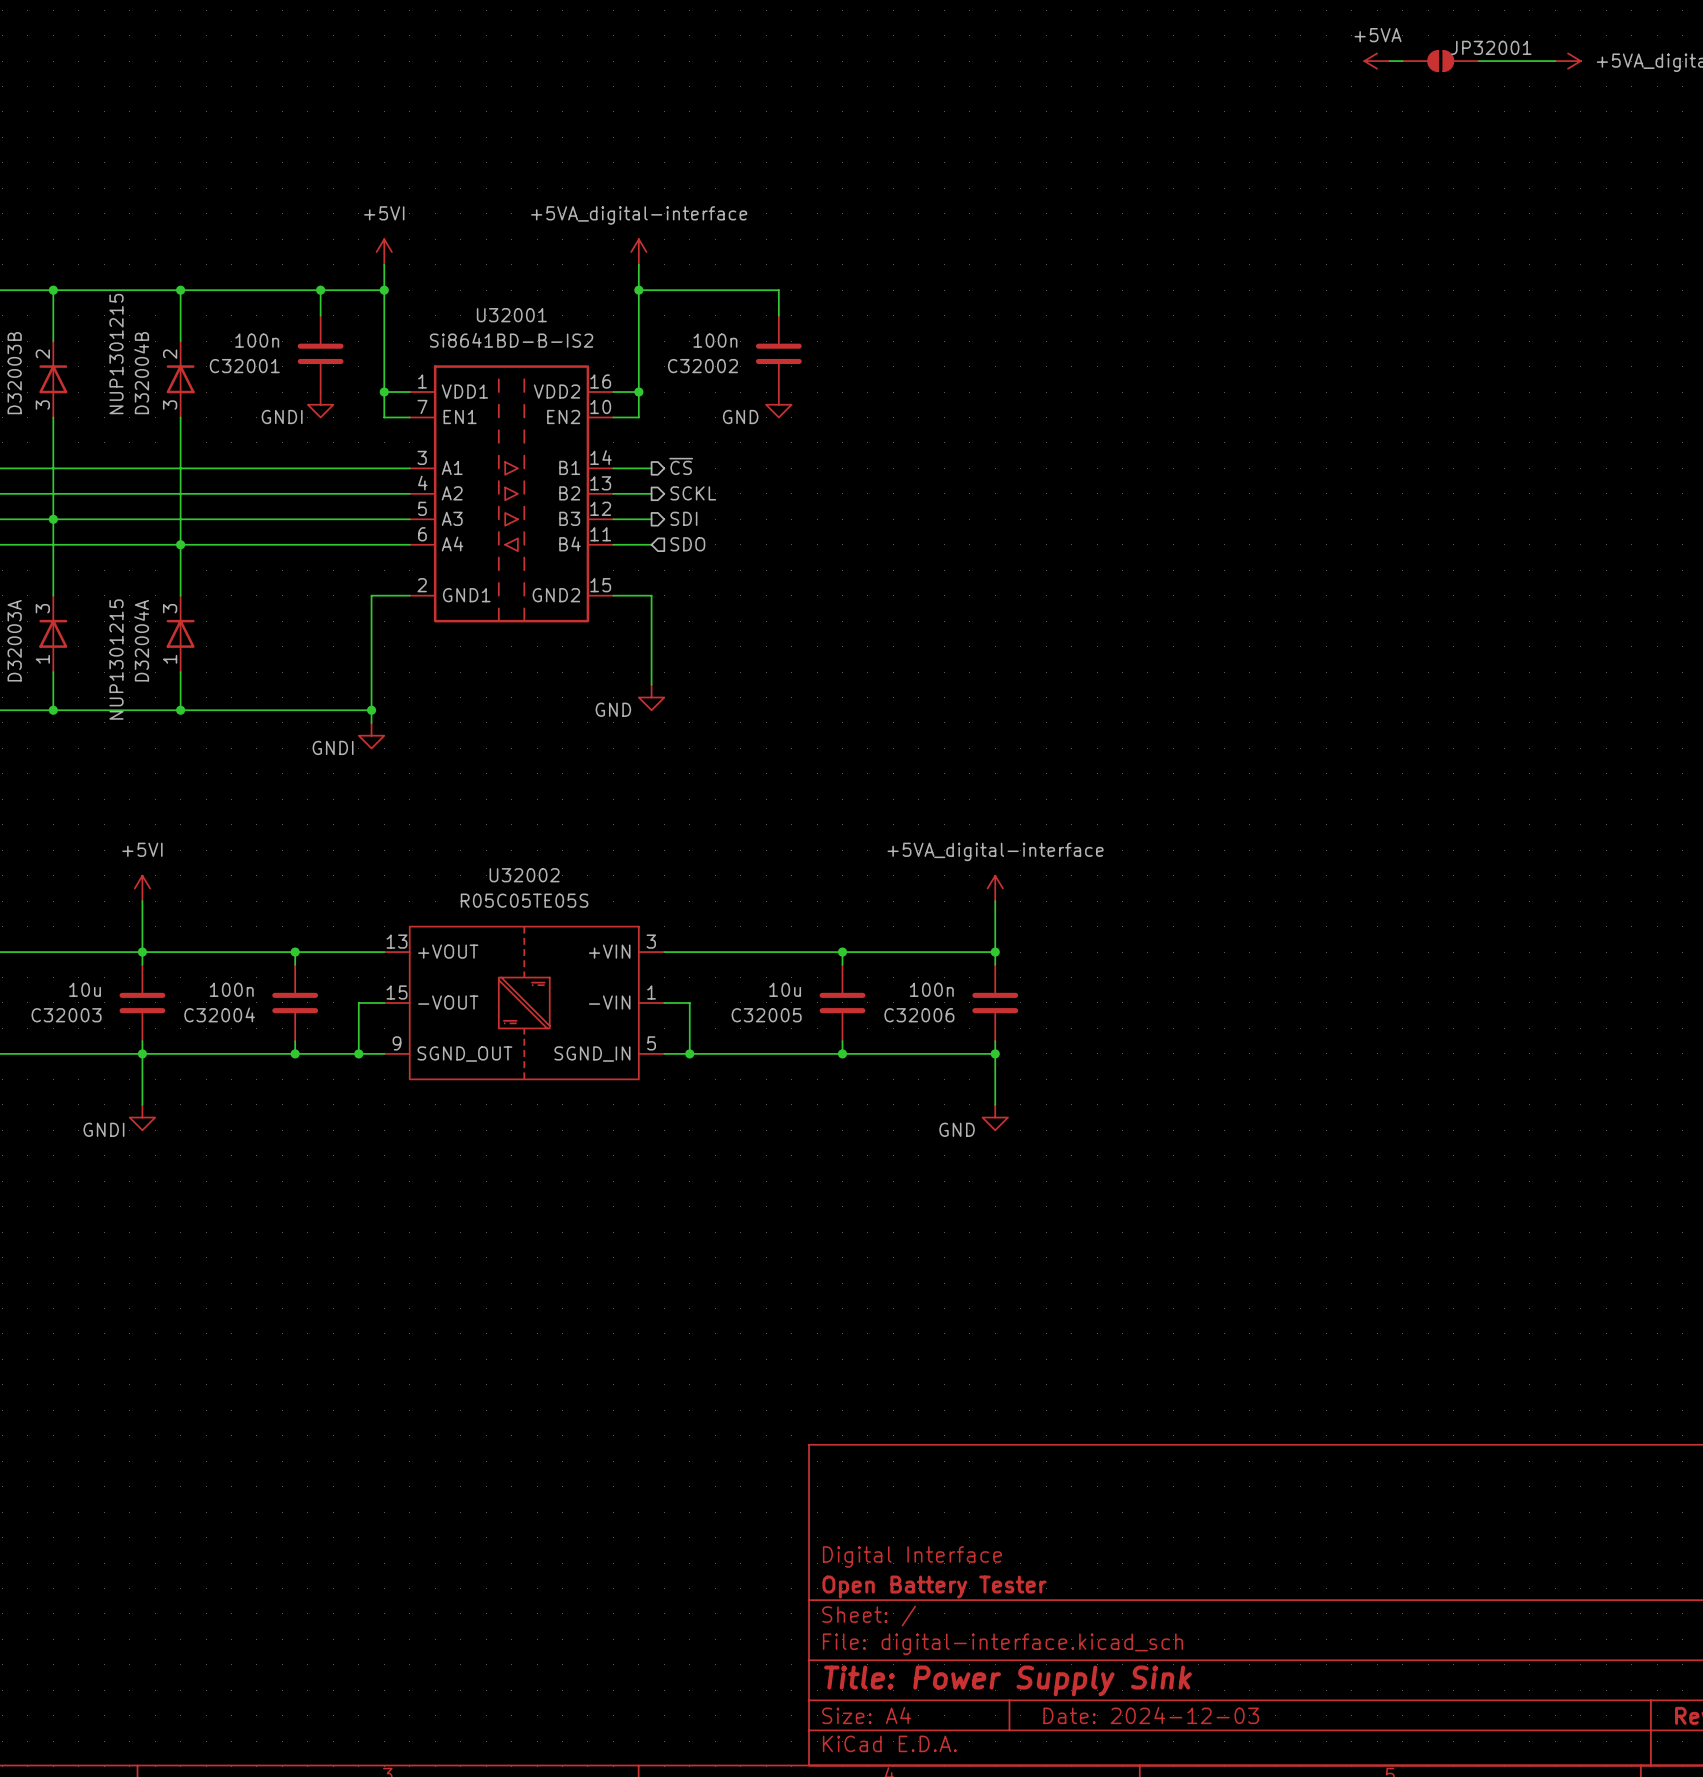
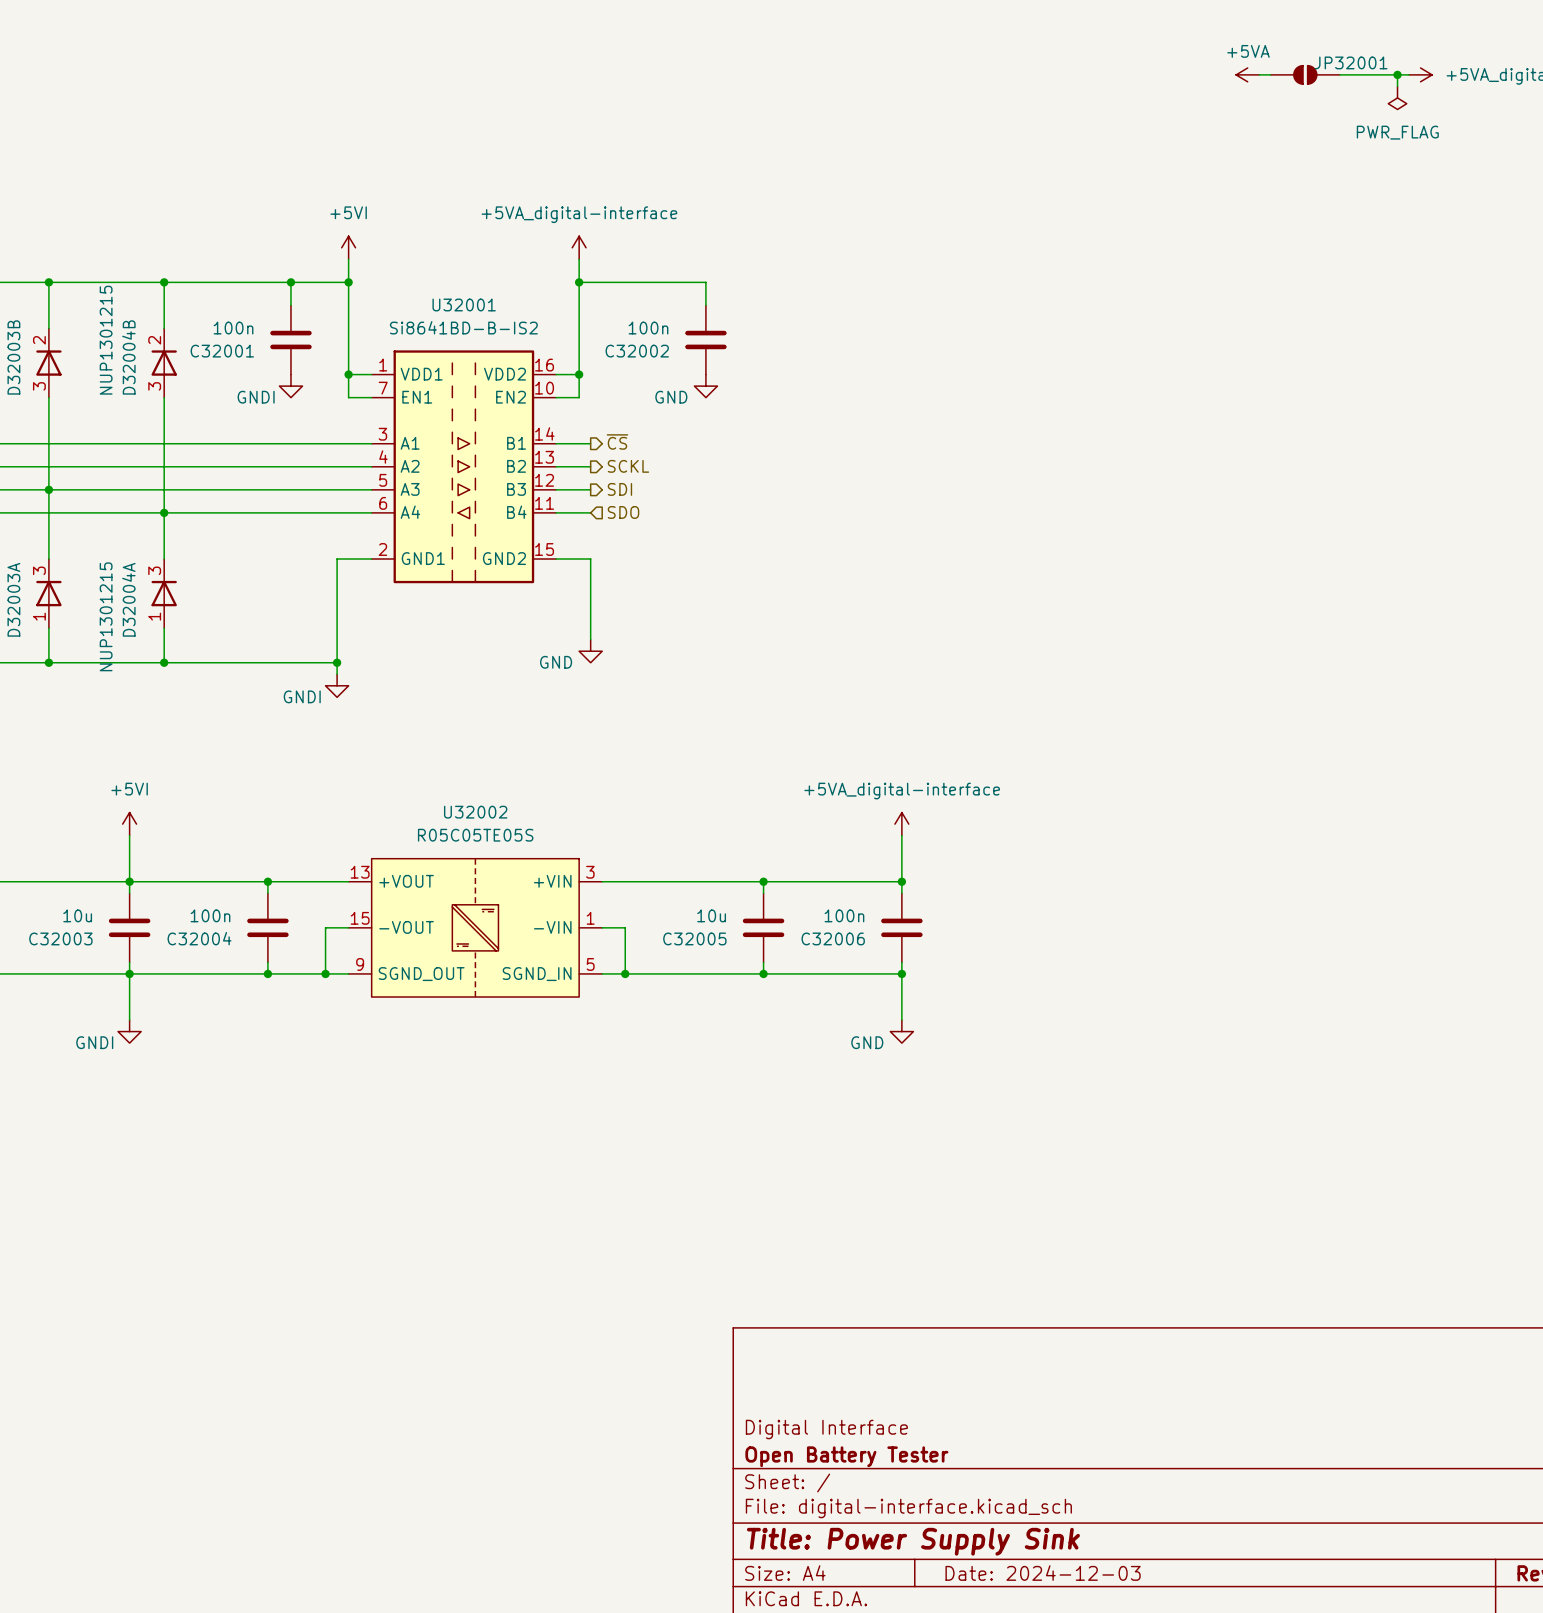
wire: none -> (1397, 74) (1397, 86)
junction: none -> (1397, 74)
power symbol: none -> PWR_FLAG (1397, 97)

